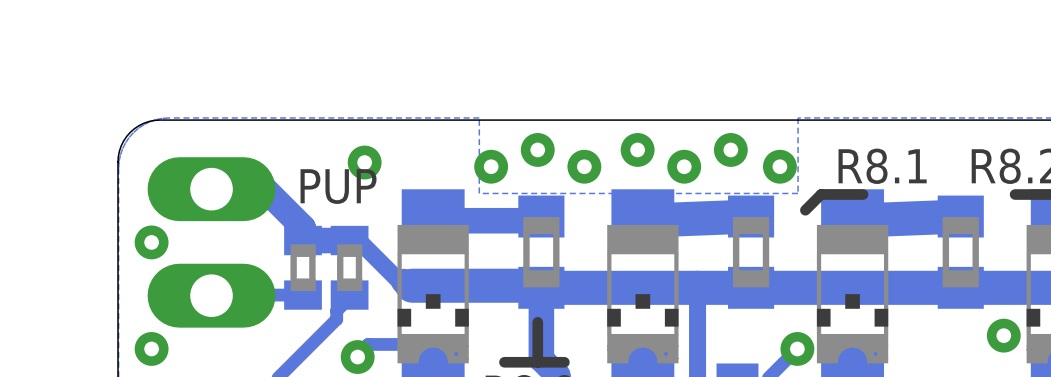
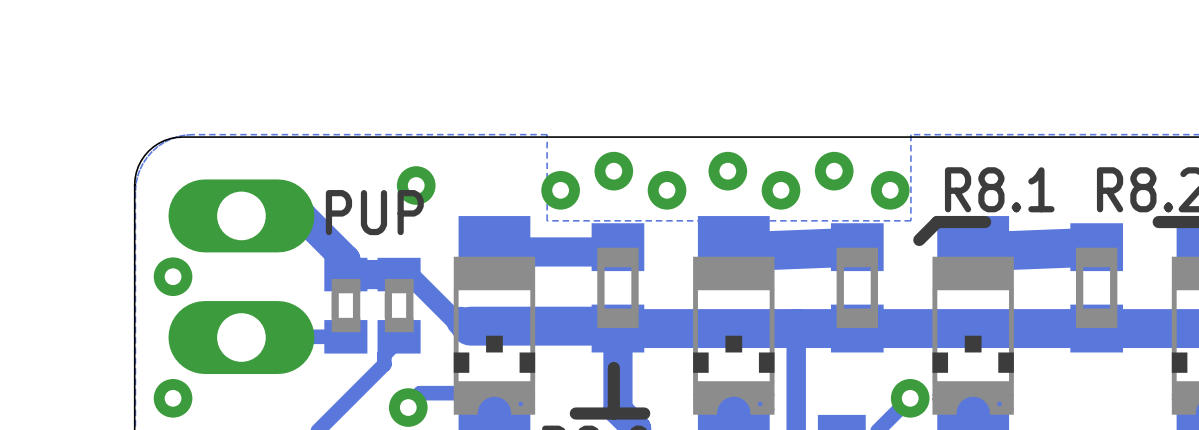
via: (1003, 335) -> none

